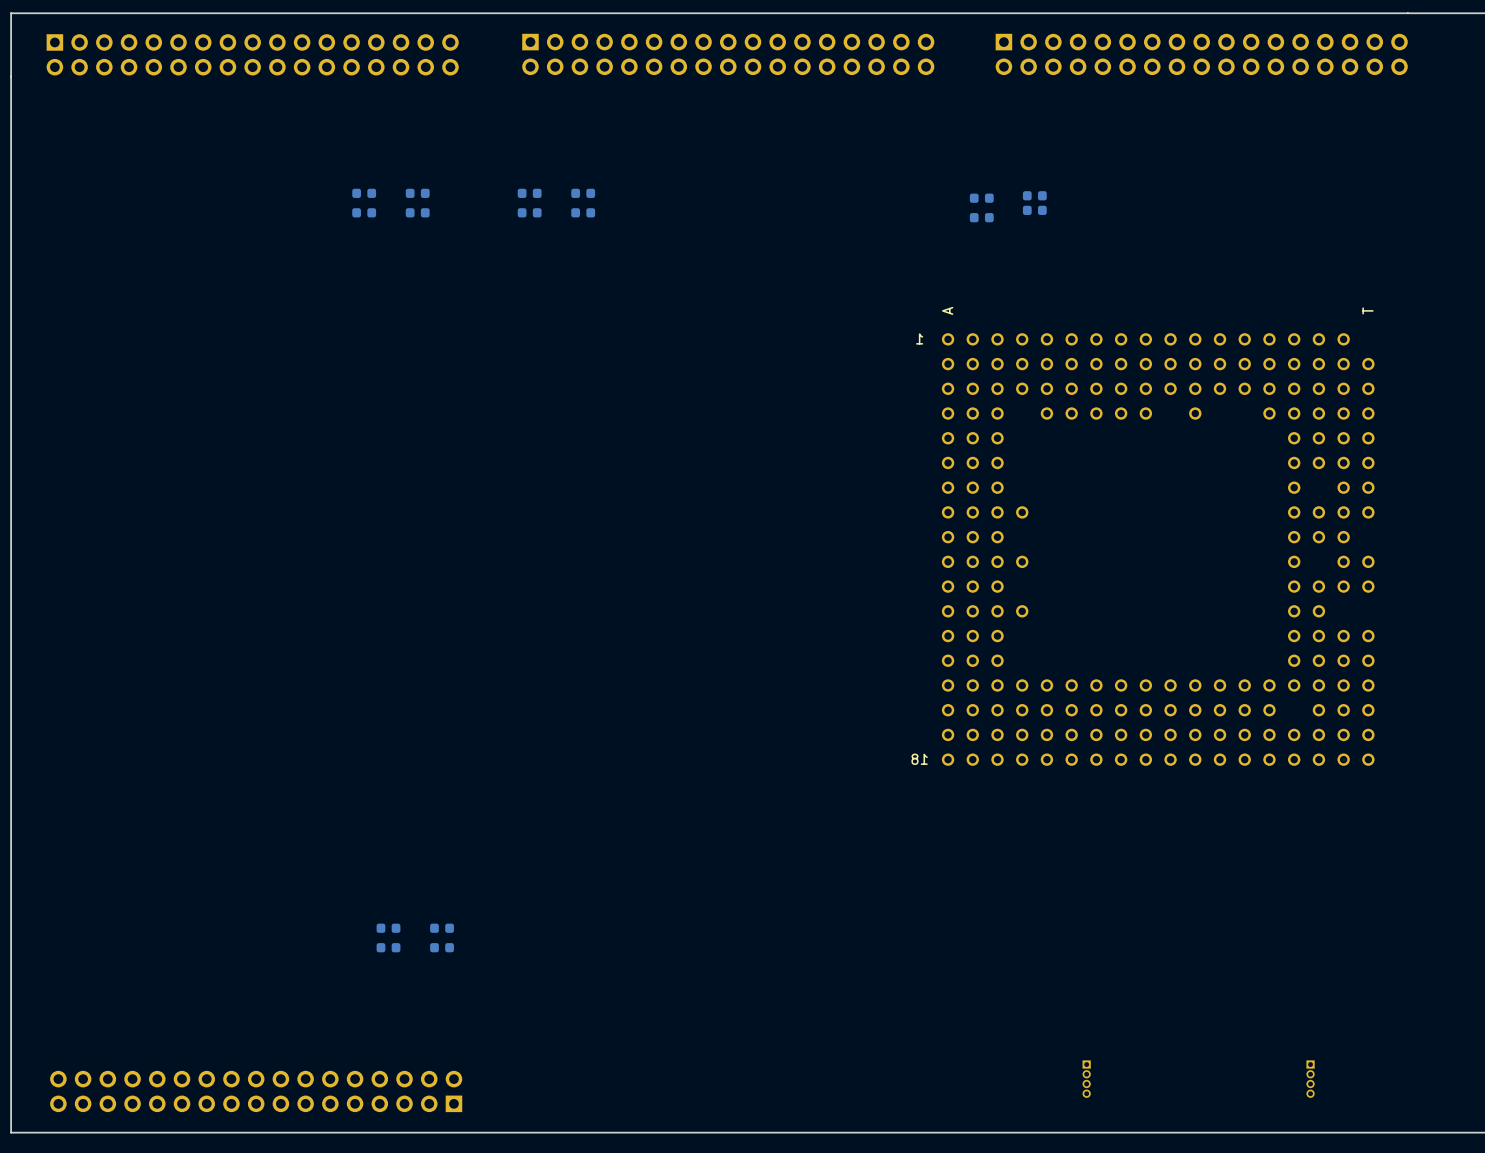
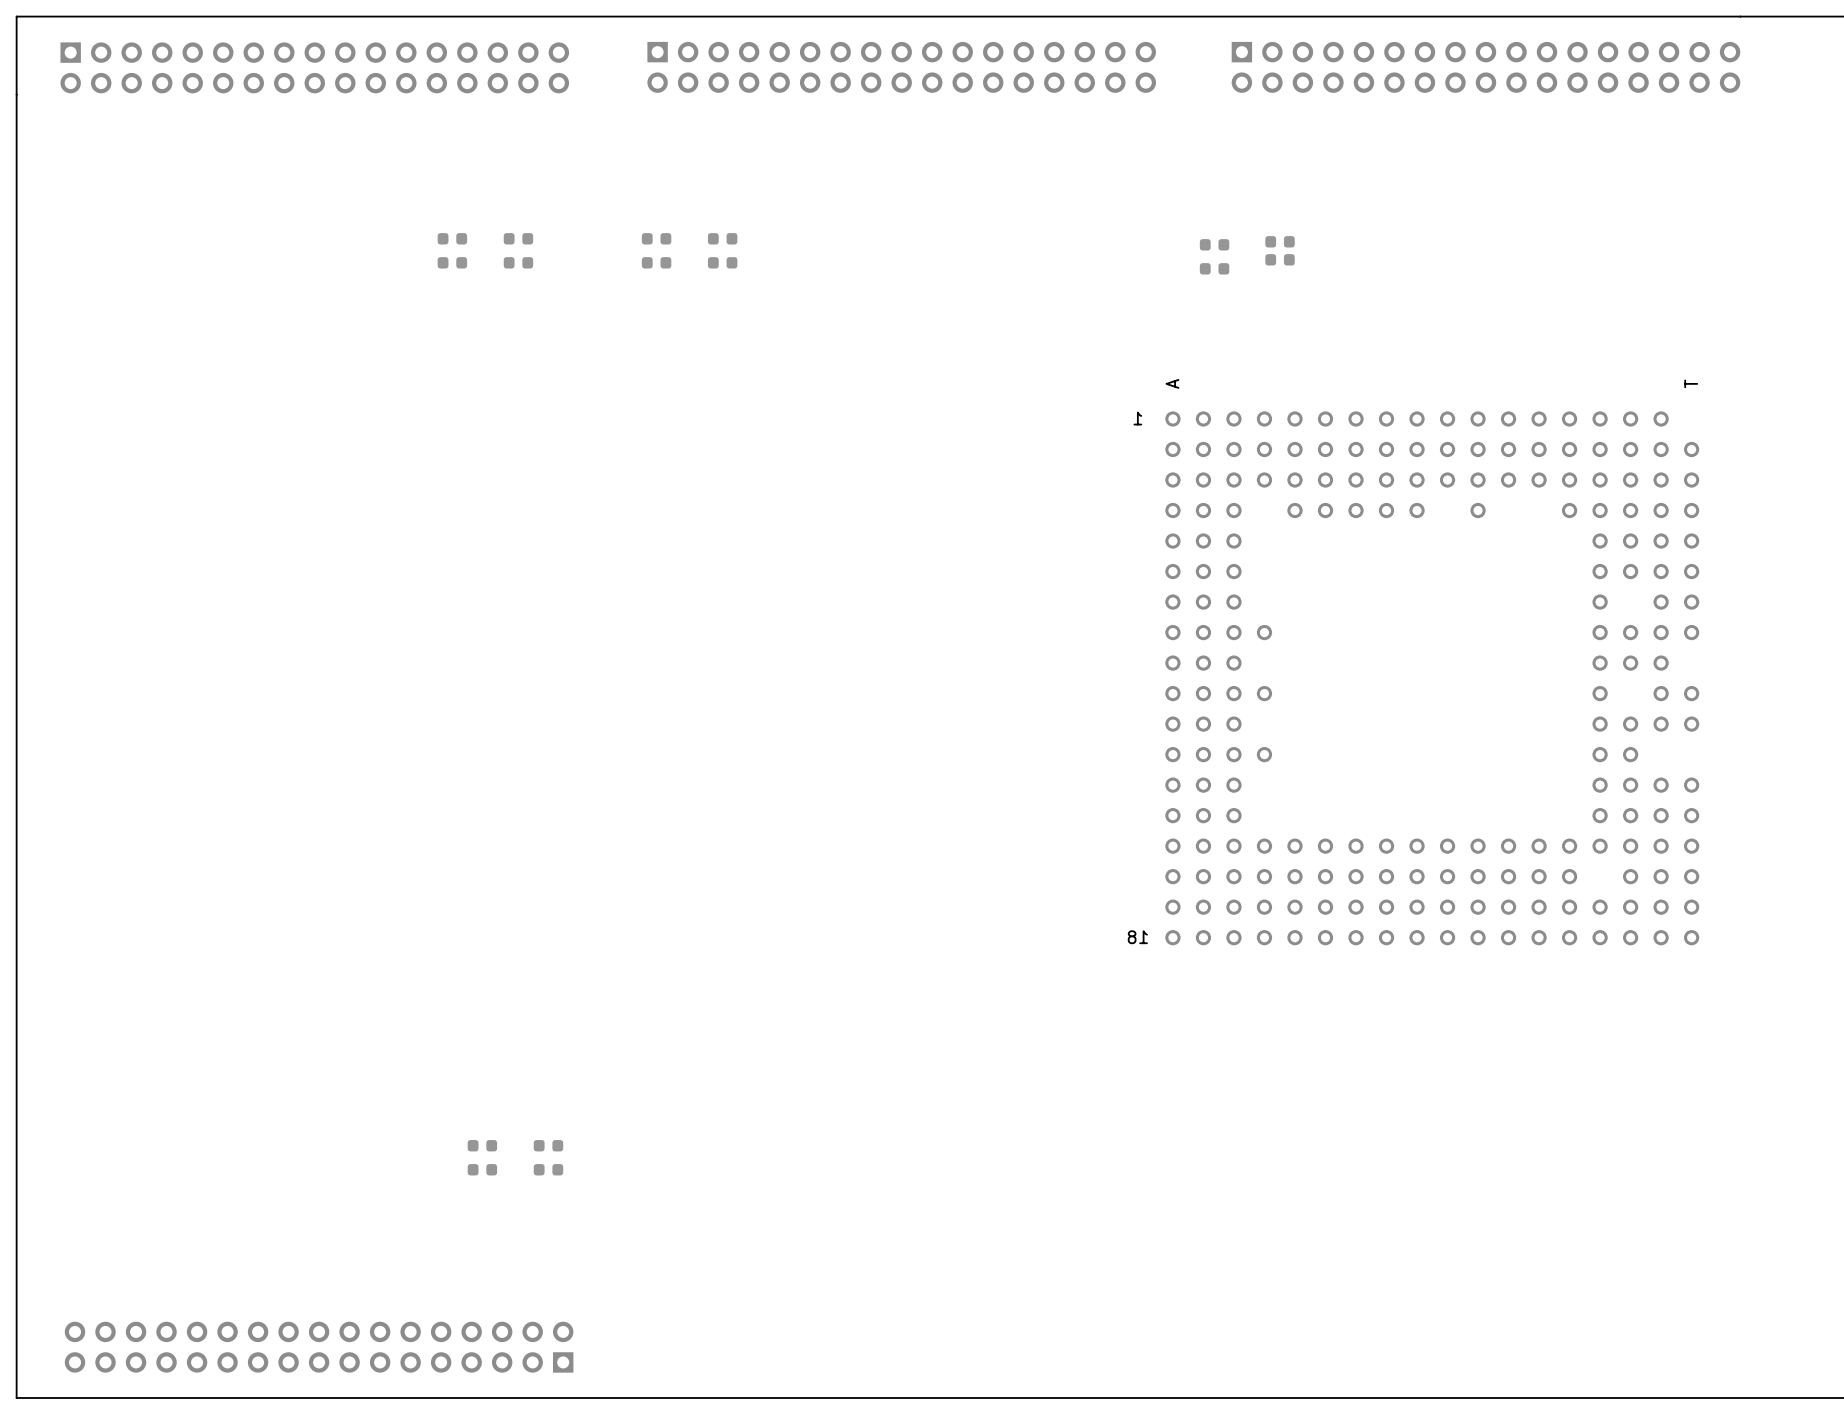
part: (1086, 1079) -> none
part: (1310, 1079) -> none

